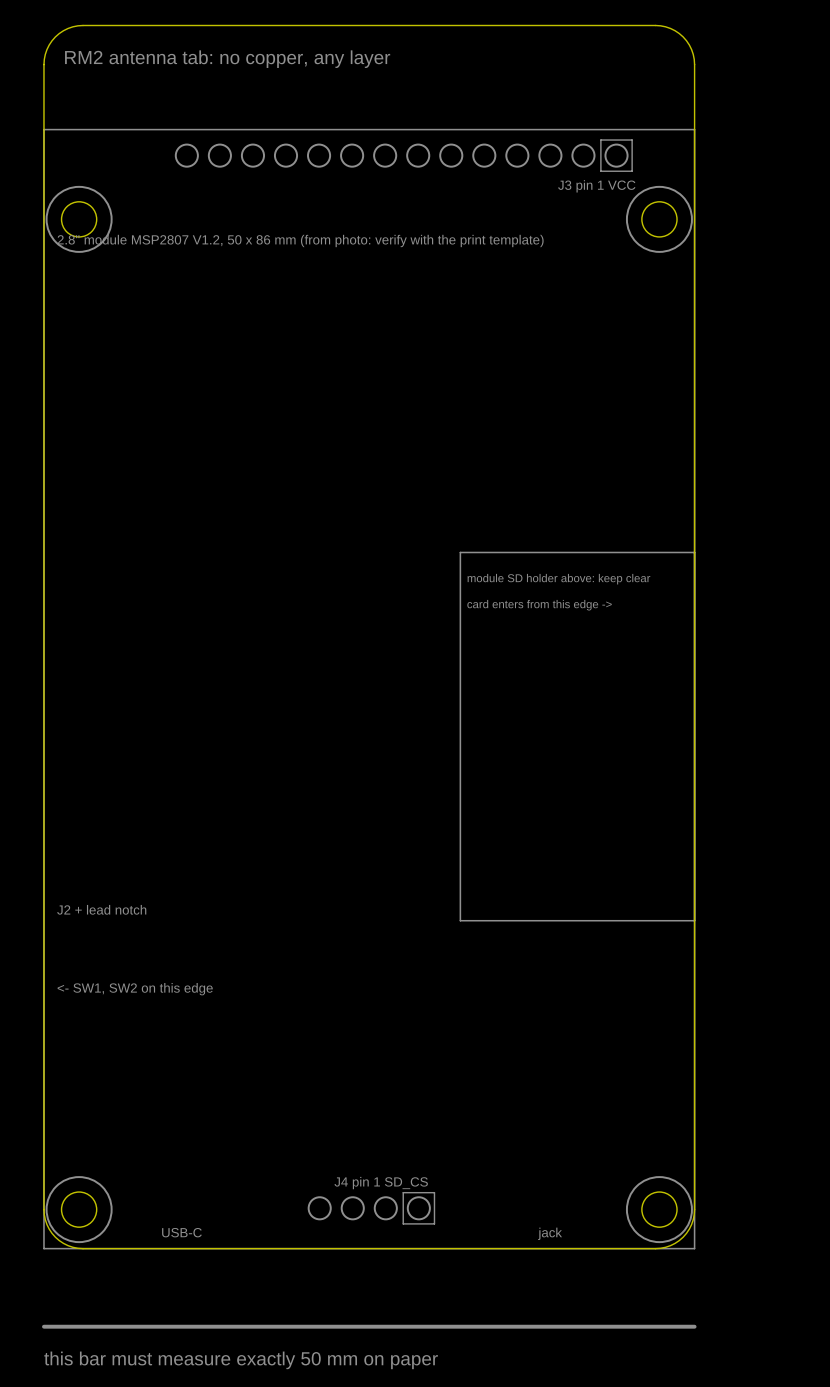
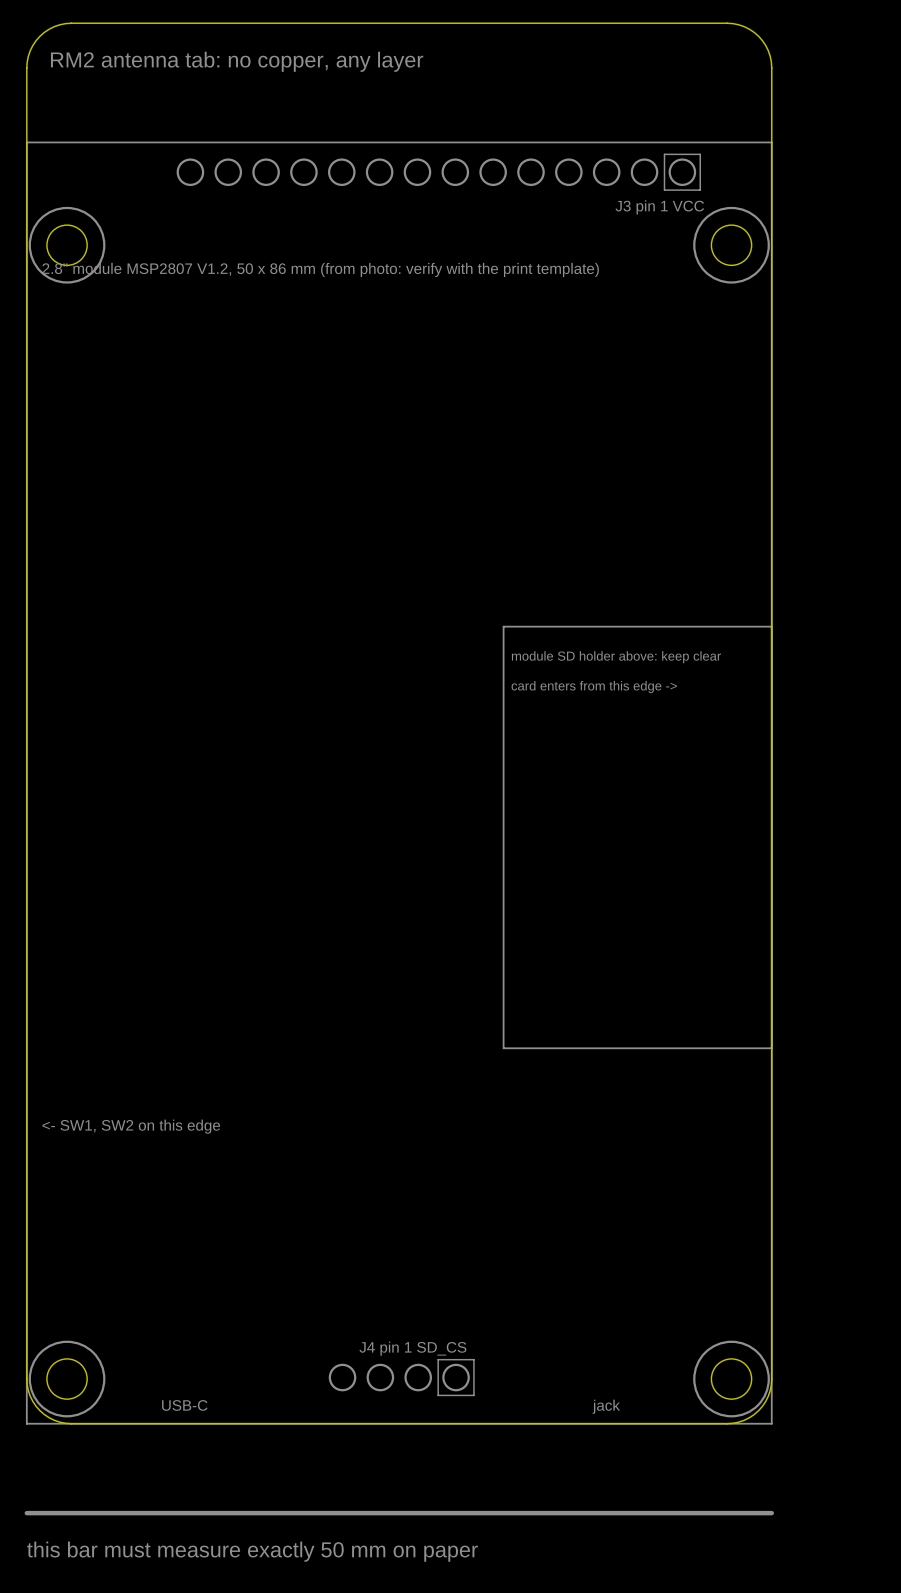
text: J2 + lead notch (101, 909) -> none

